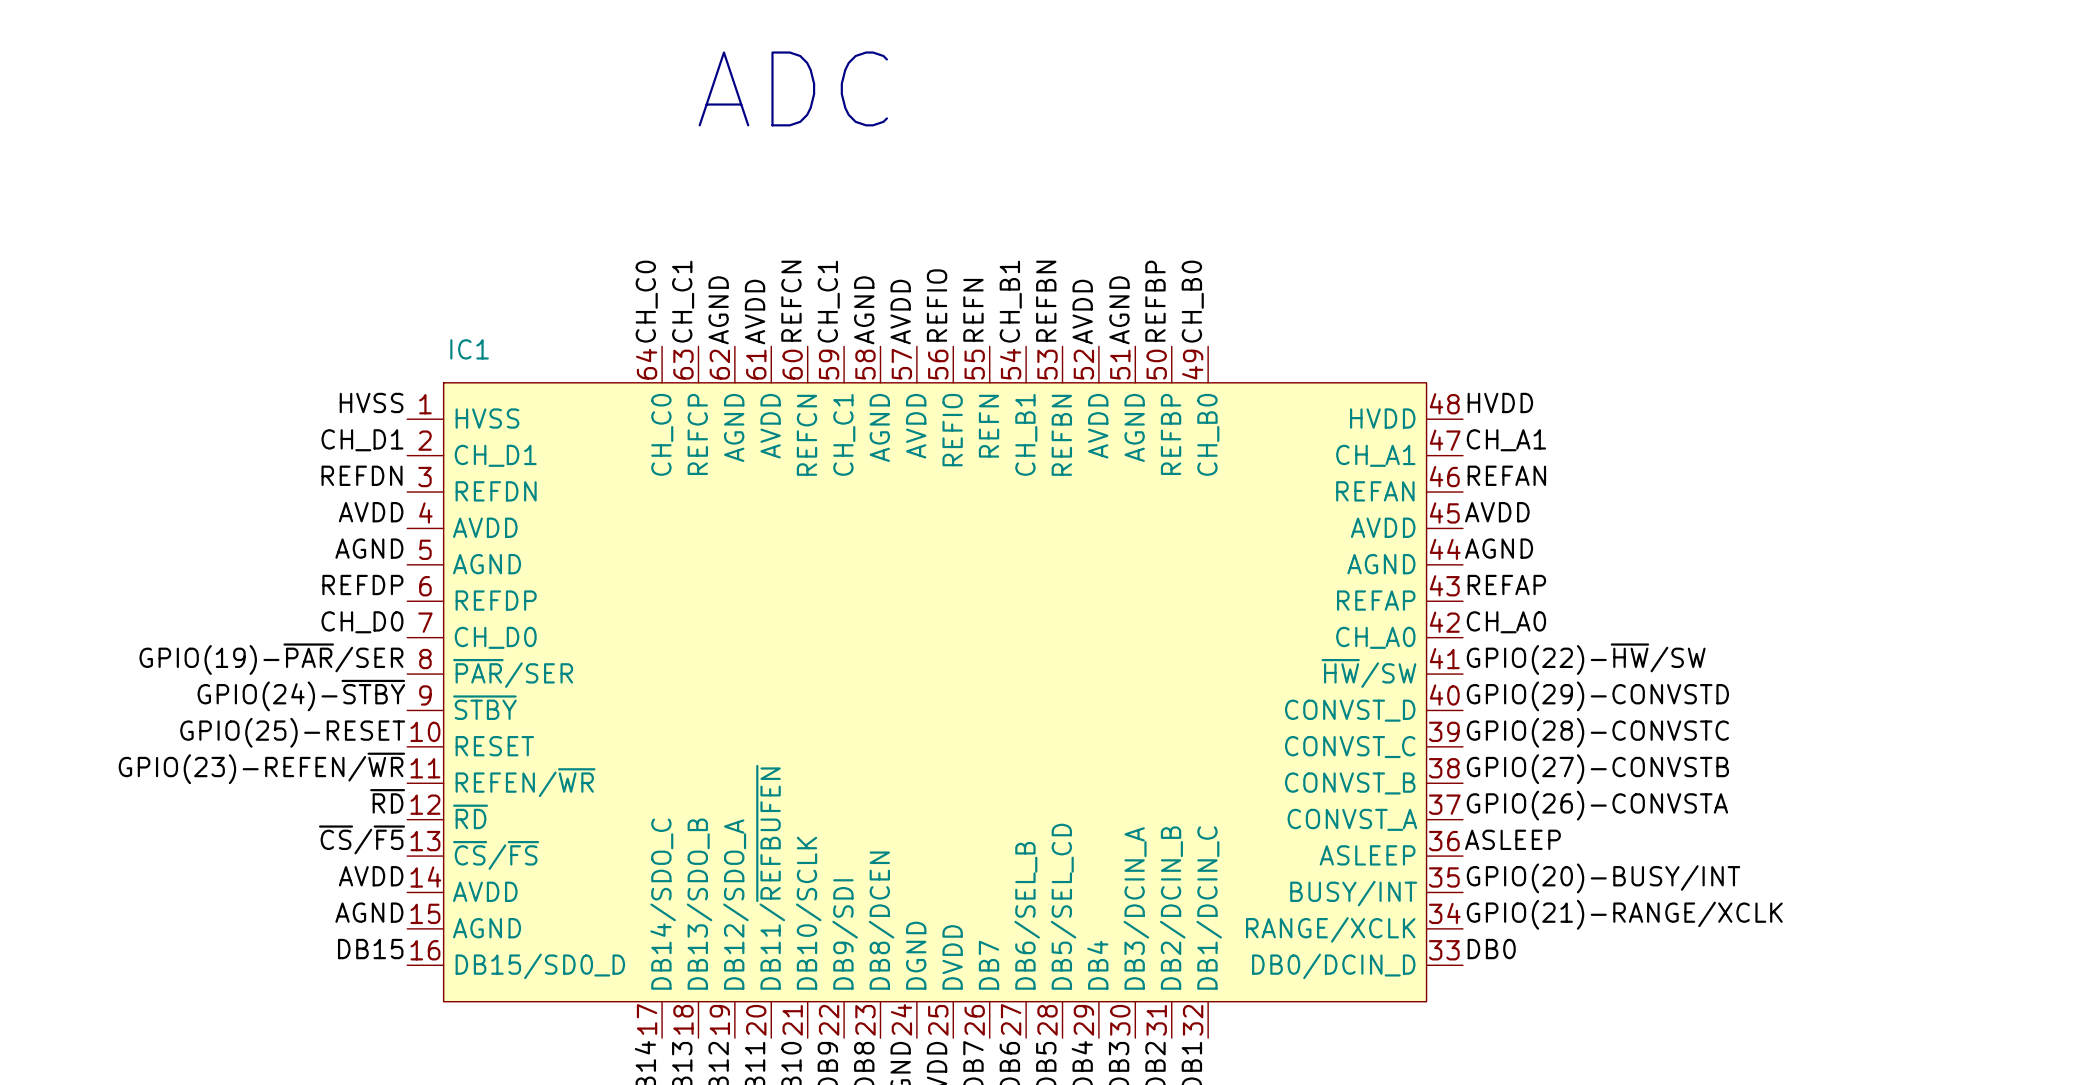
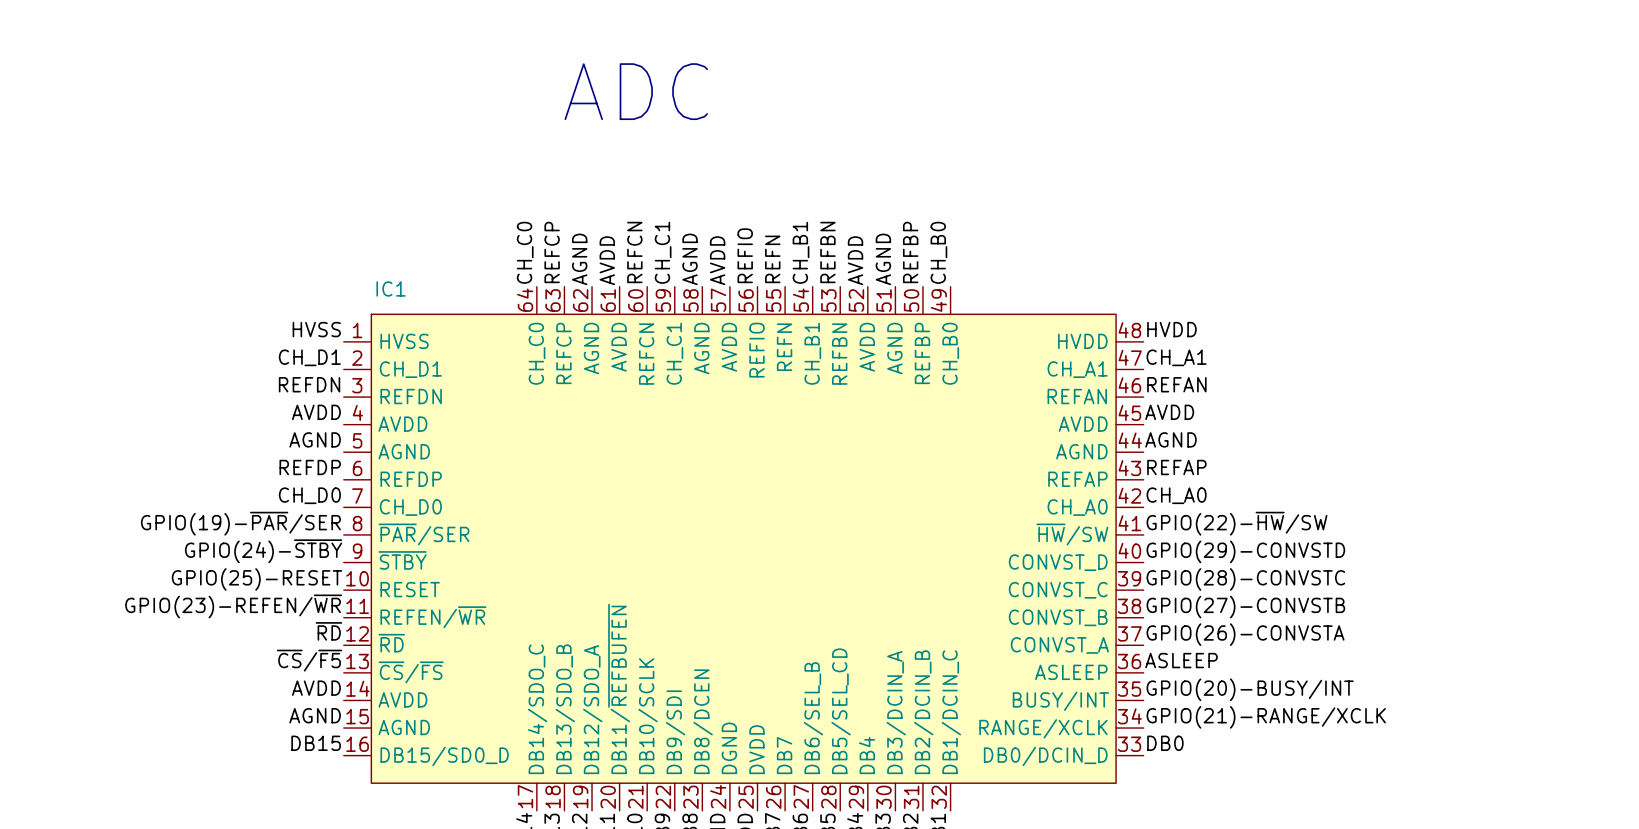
label: CH_C1 (683, 301) -> REFCP (552, 252)

